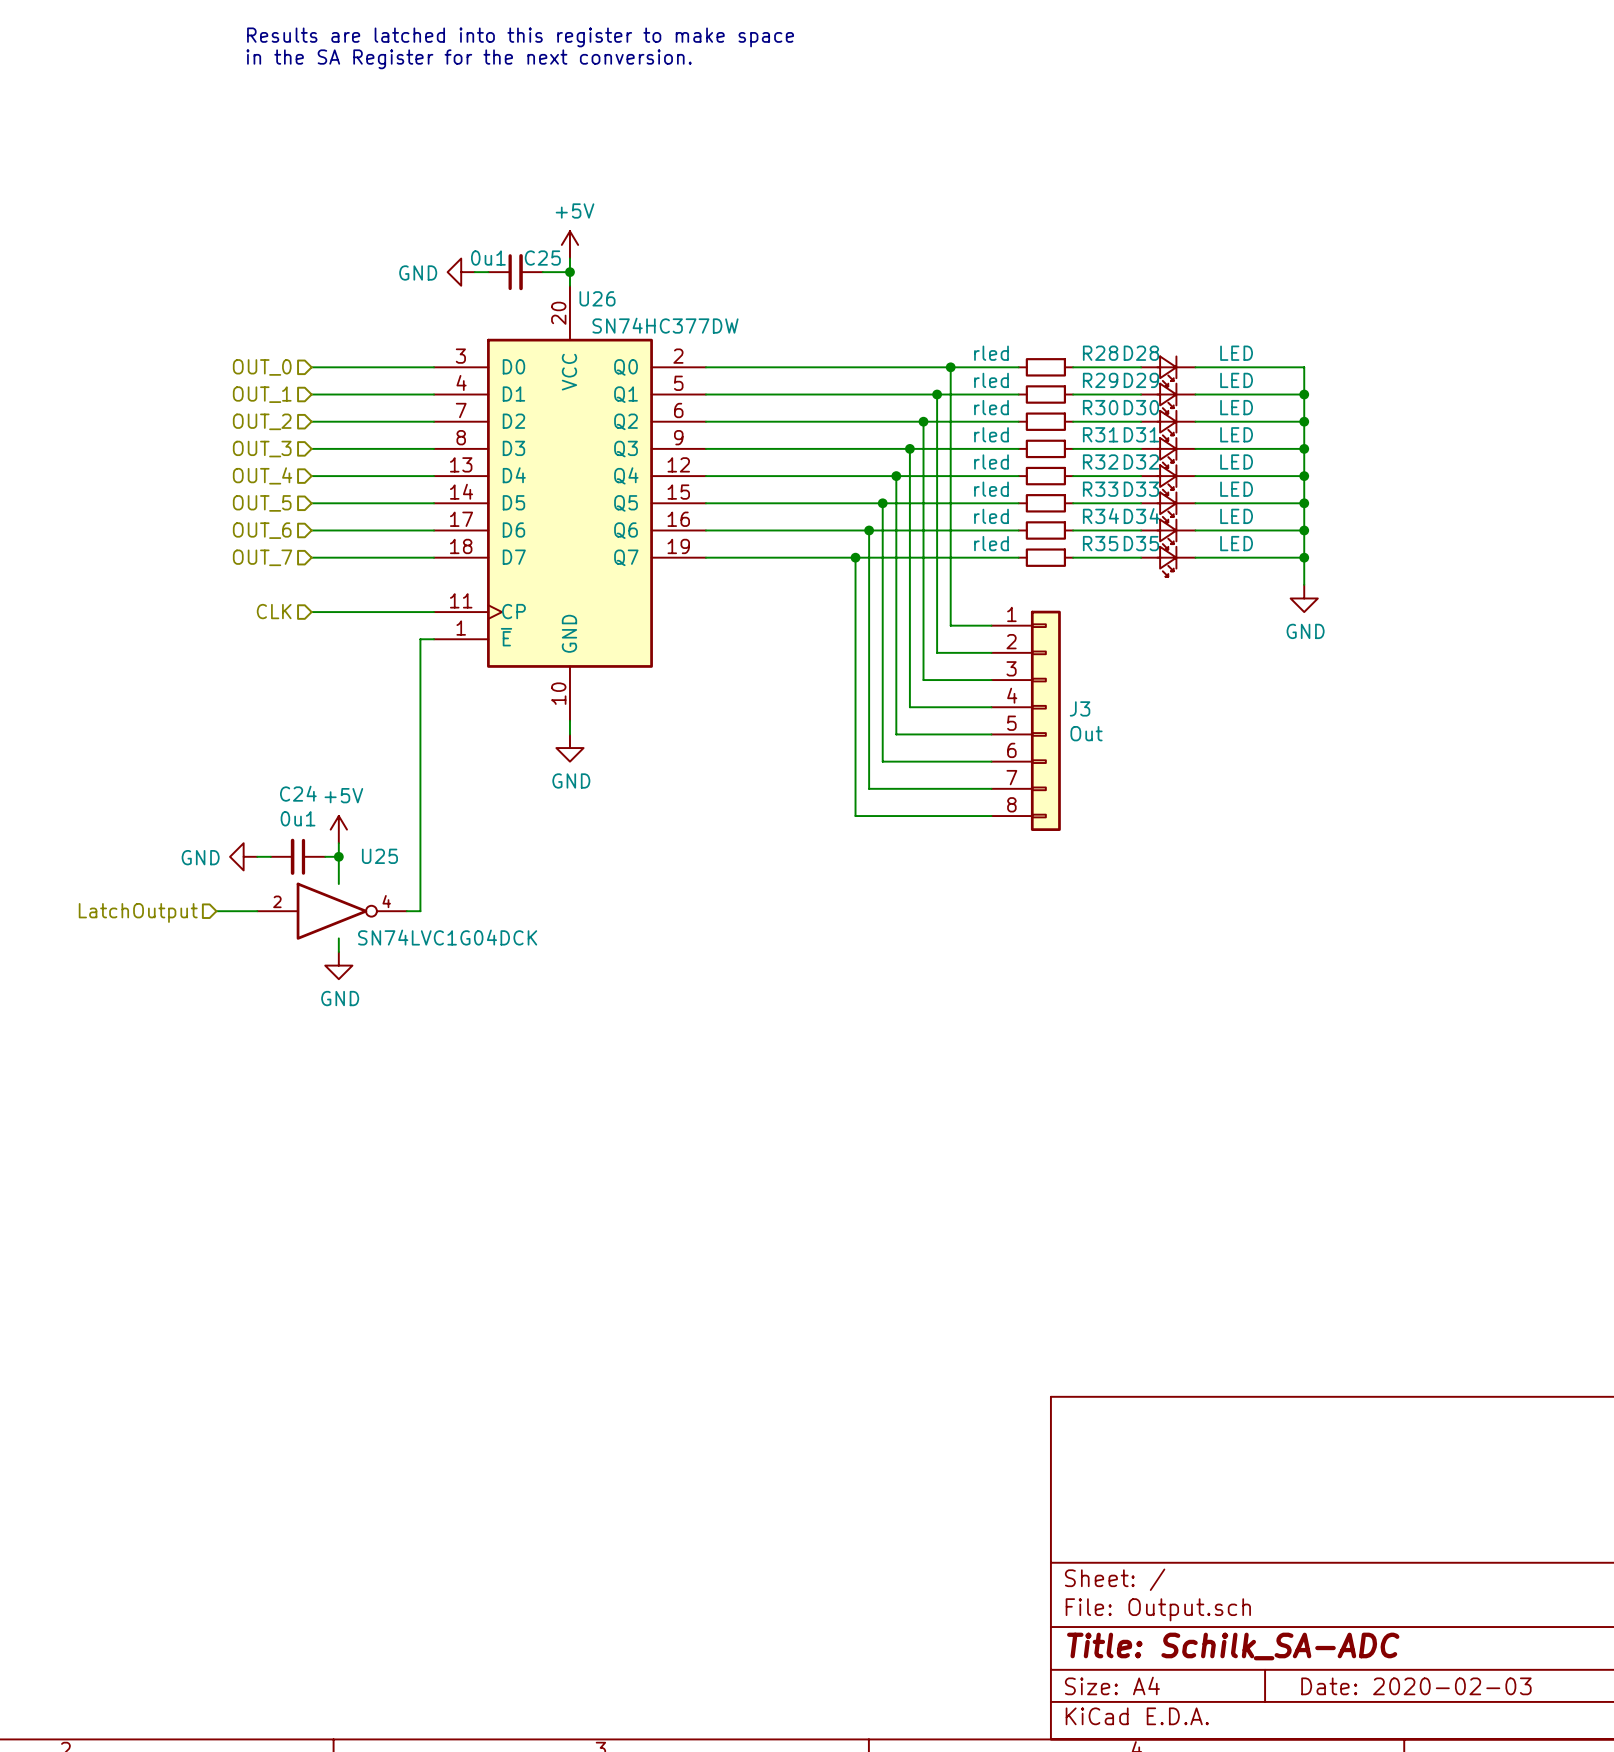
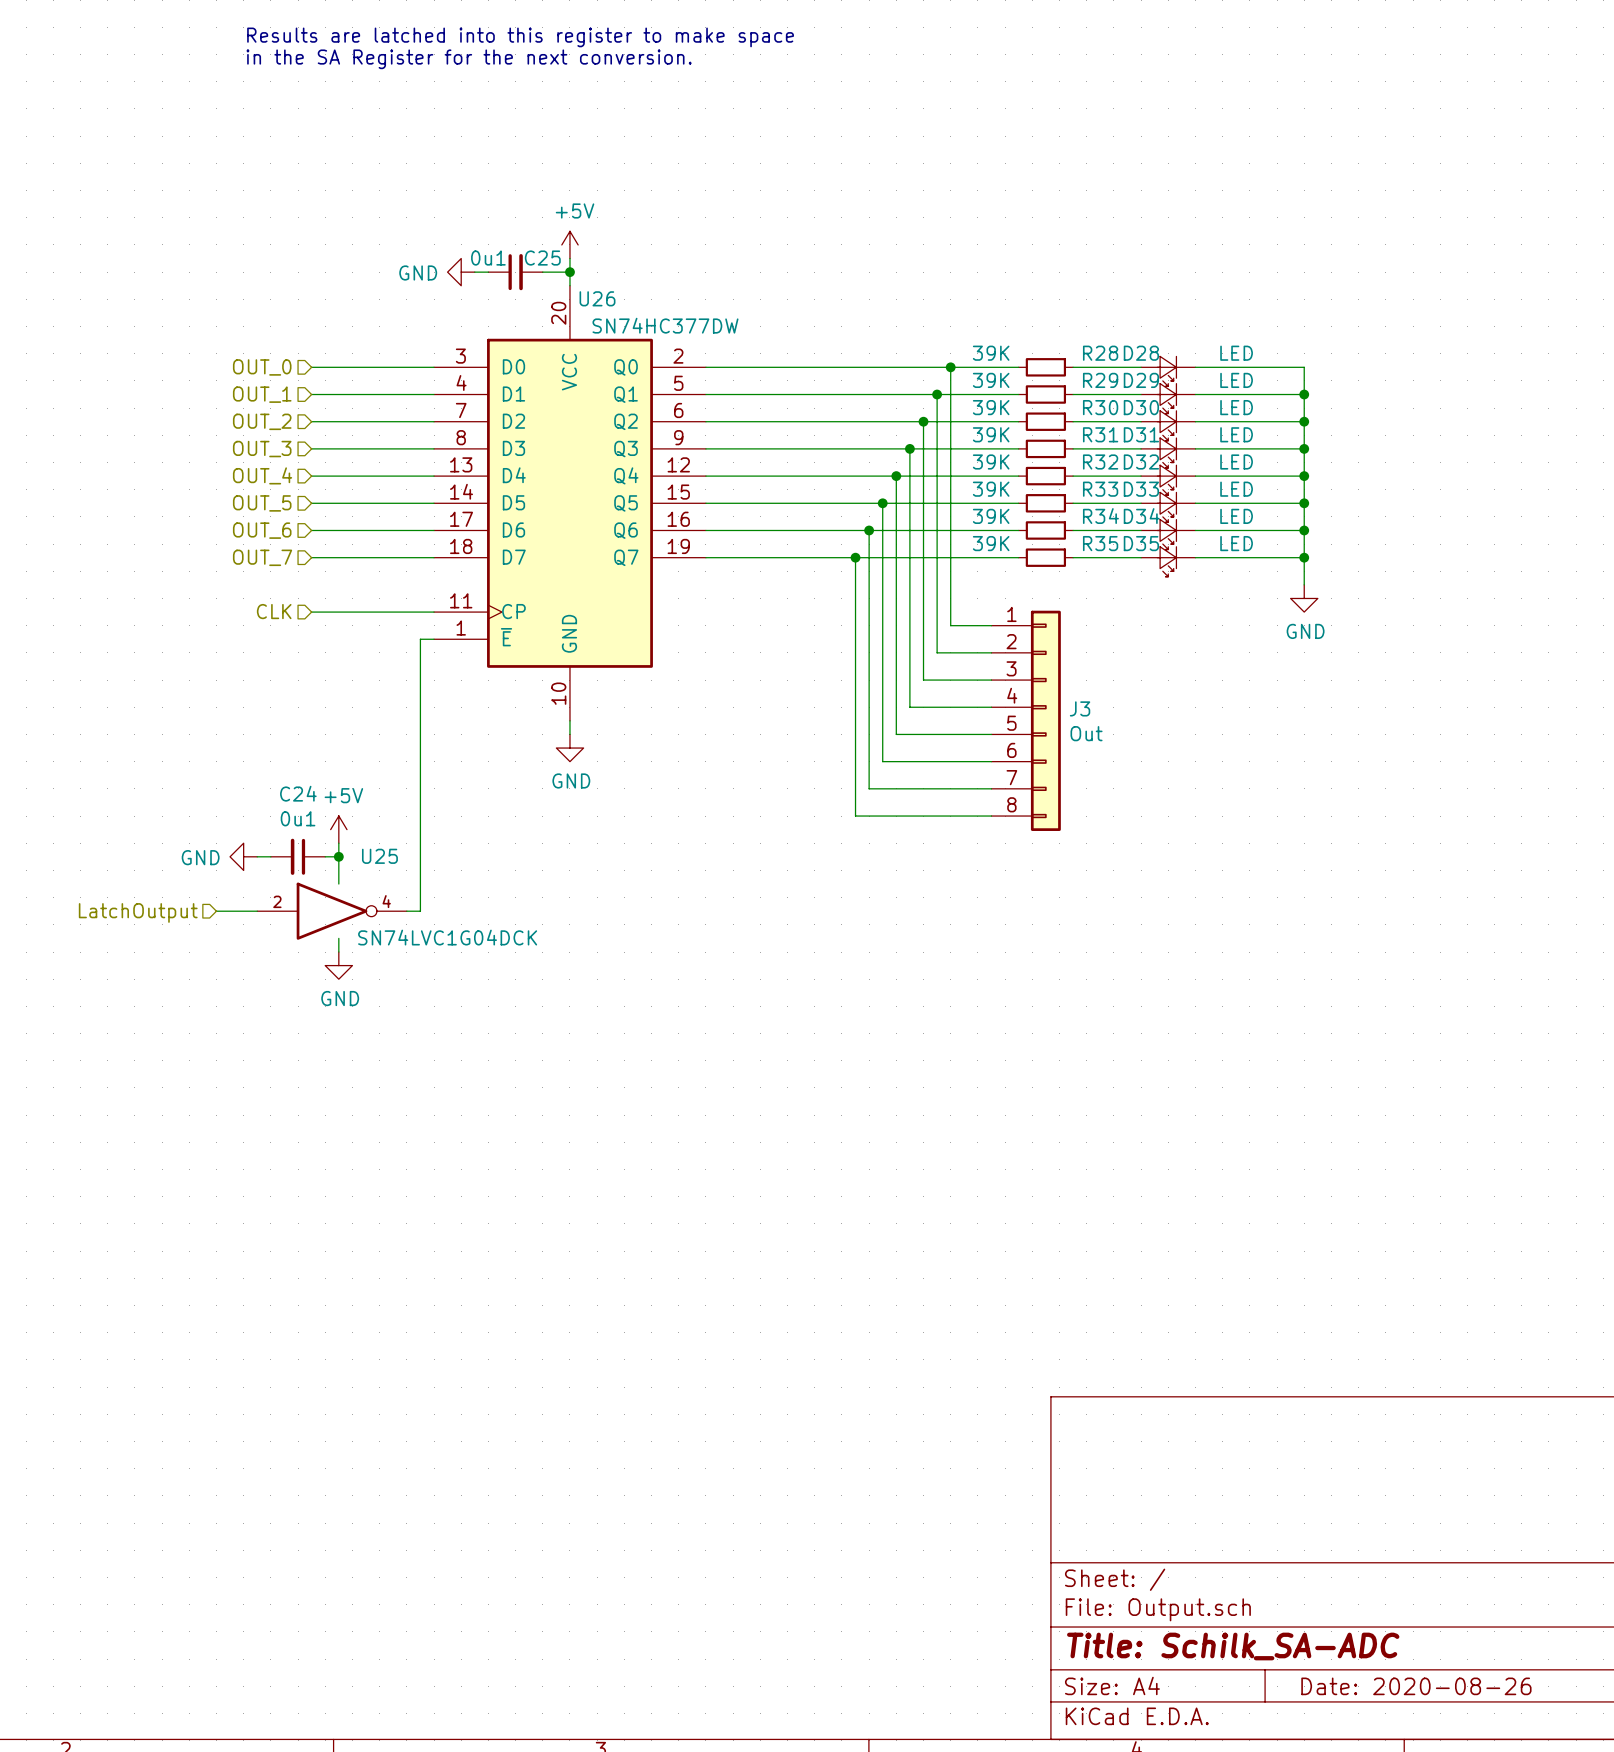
R28 value: rled (991, 353) -> 39K (991, 353)
R29 value: rled (991, 380) -> 39K (991, 380)
R30 value: rled (991, 407) -> 39K (991, 407)
R31 value: rled (991, 434) -> 39K (991, 434)
R32 value: rled (991, 461) -> 39K (991, 461)
R33 value: rled (991, 489) -> 39K (991, 489)
R34 value: rled (991, 516) -> 39K (991, 516)
R35 value: rled (991, 543) -> 39K (991, 543)
title block: Date: 2020-02-03 (1416, 1686) -> Date: 2020-08-26 (1416, 1686)

